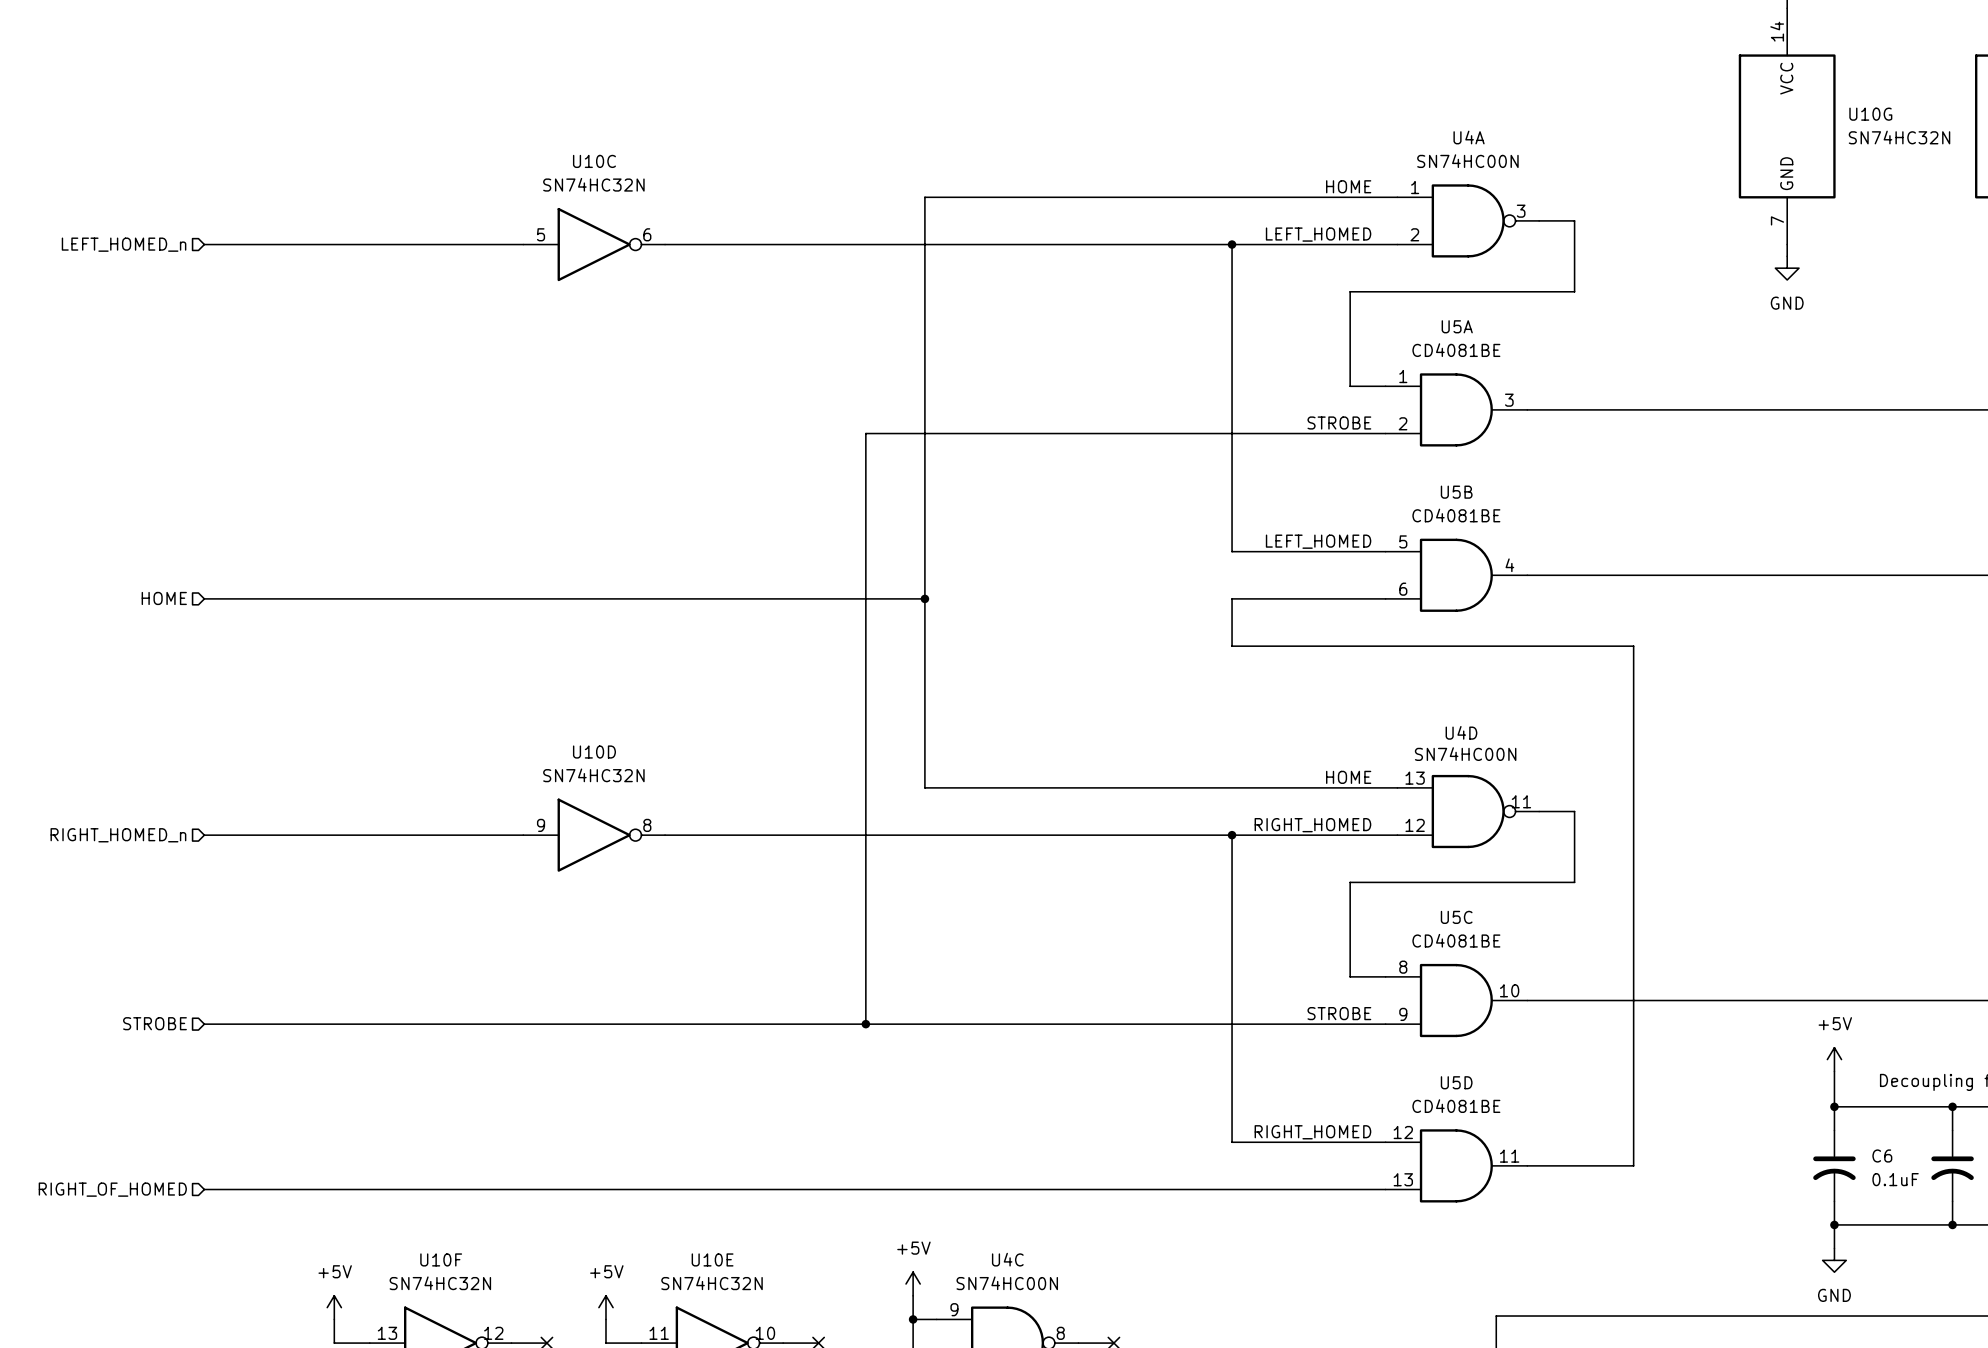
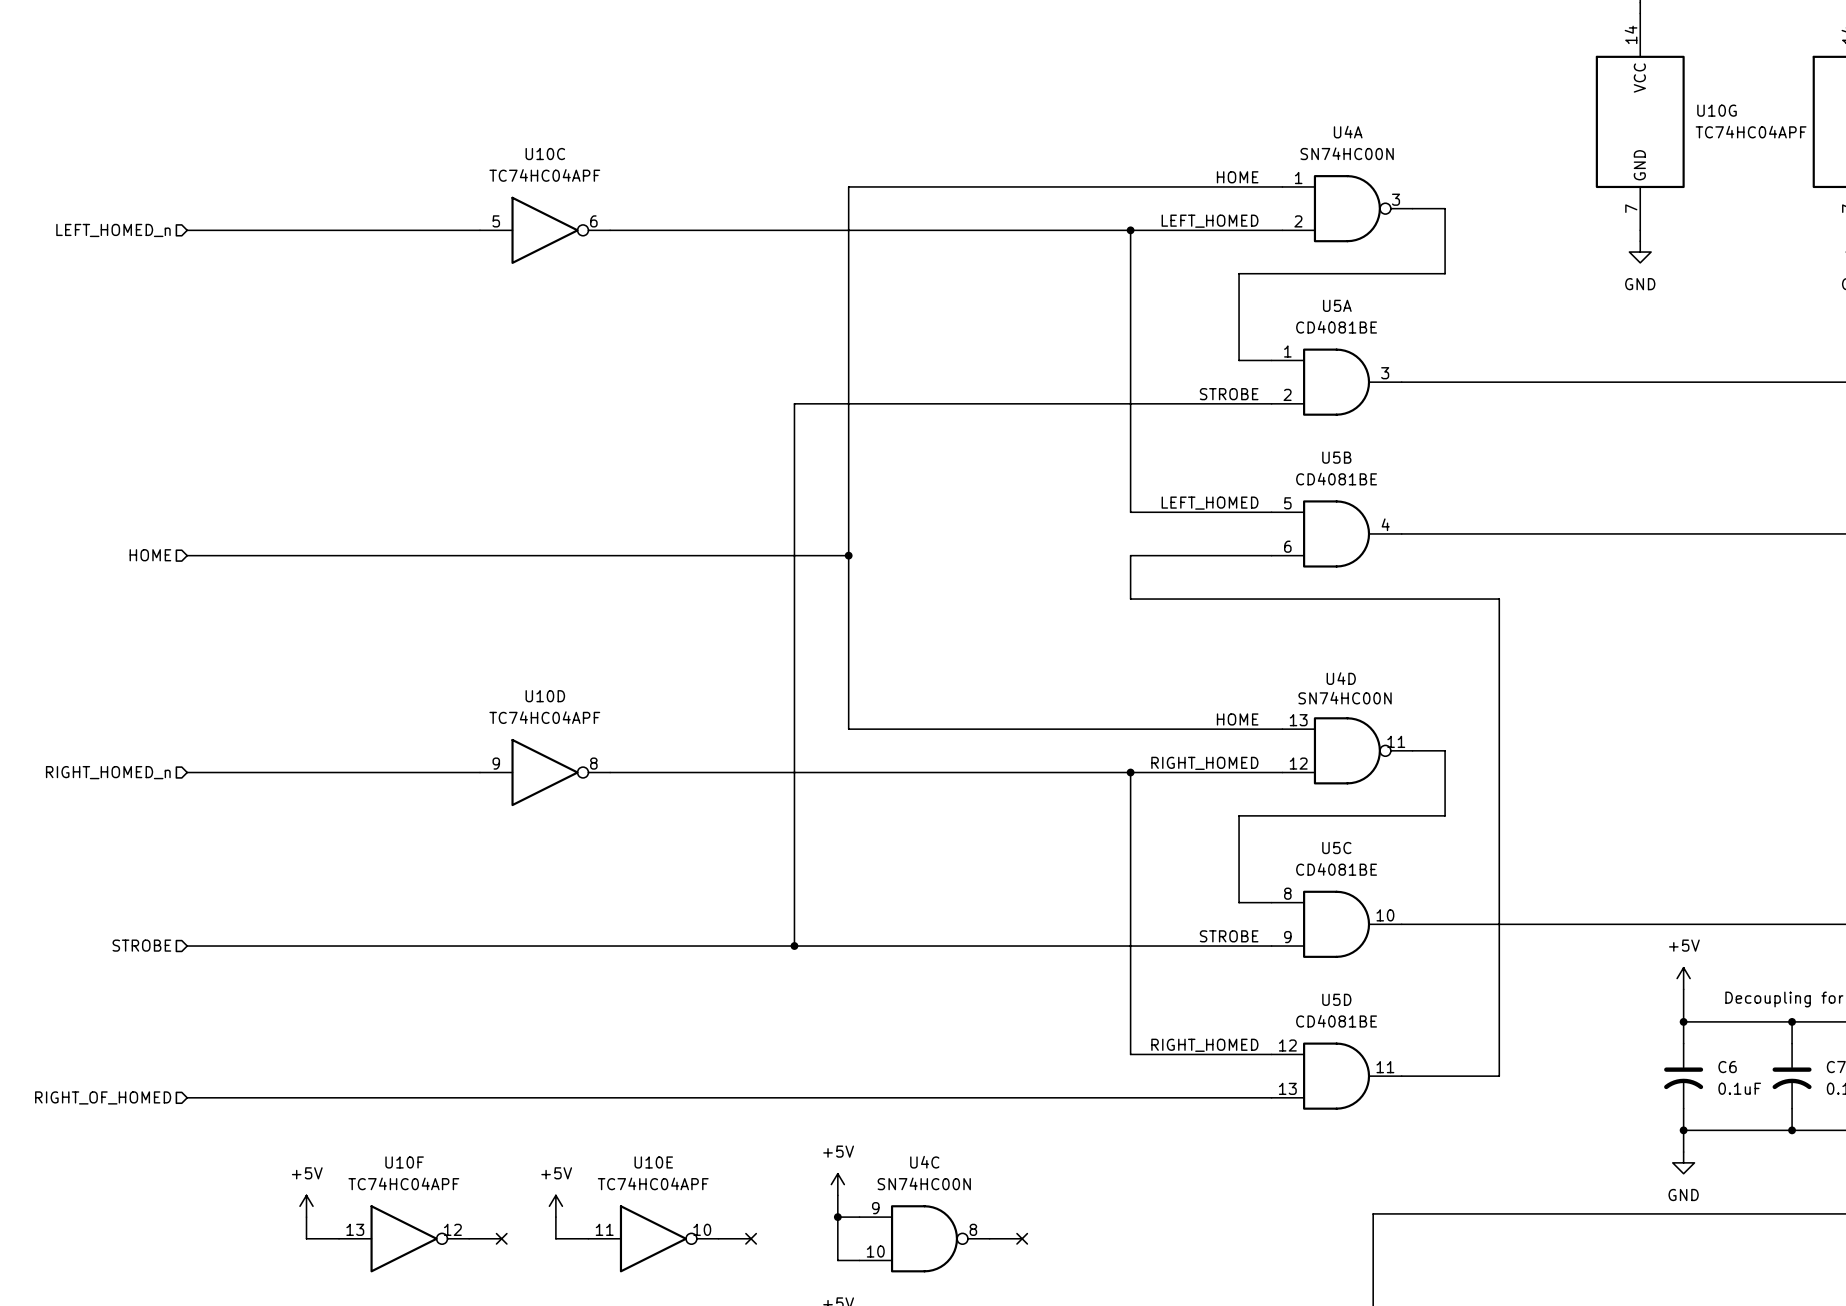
U10G value: SN74HC32N (1899, 137) -> TC74HC04APF (1751, 132)
U10C value: SN74HC32N (593, 184) -> TC74HC04APF (544, 175)
U10D value: SN74HC32N (593, 775) -> TC74HC04APF (544, 717)
U10F value: SN74HC32N (440, 1283) -> TC74HC04APF (403, 1183)
U10E value: SN74HC32N (712, 1283) -> TC74HC04APF (653, 1183)

